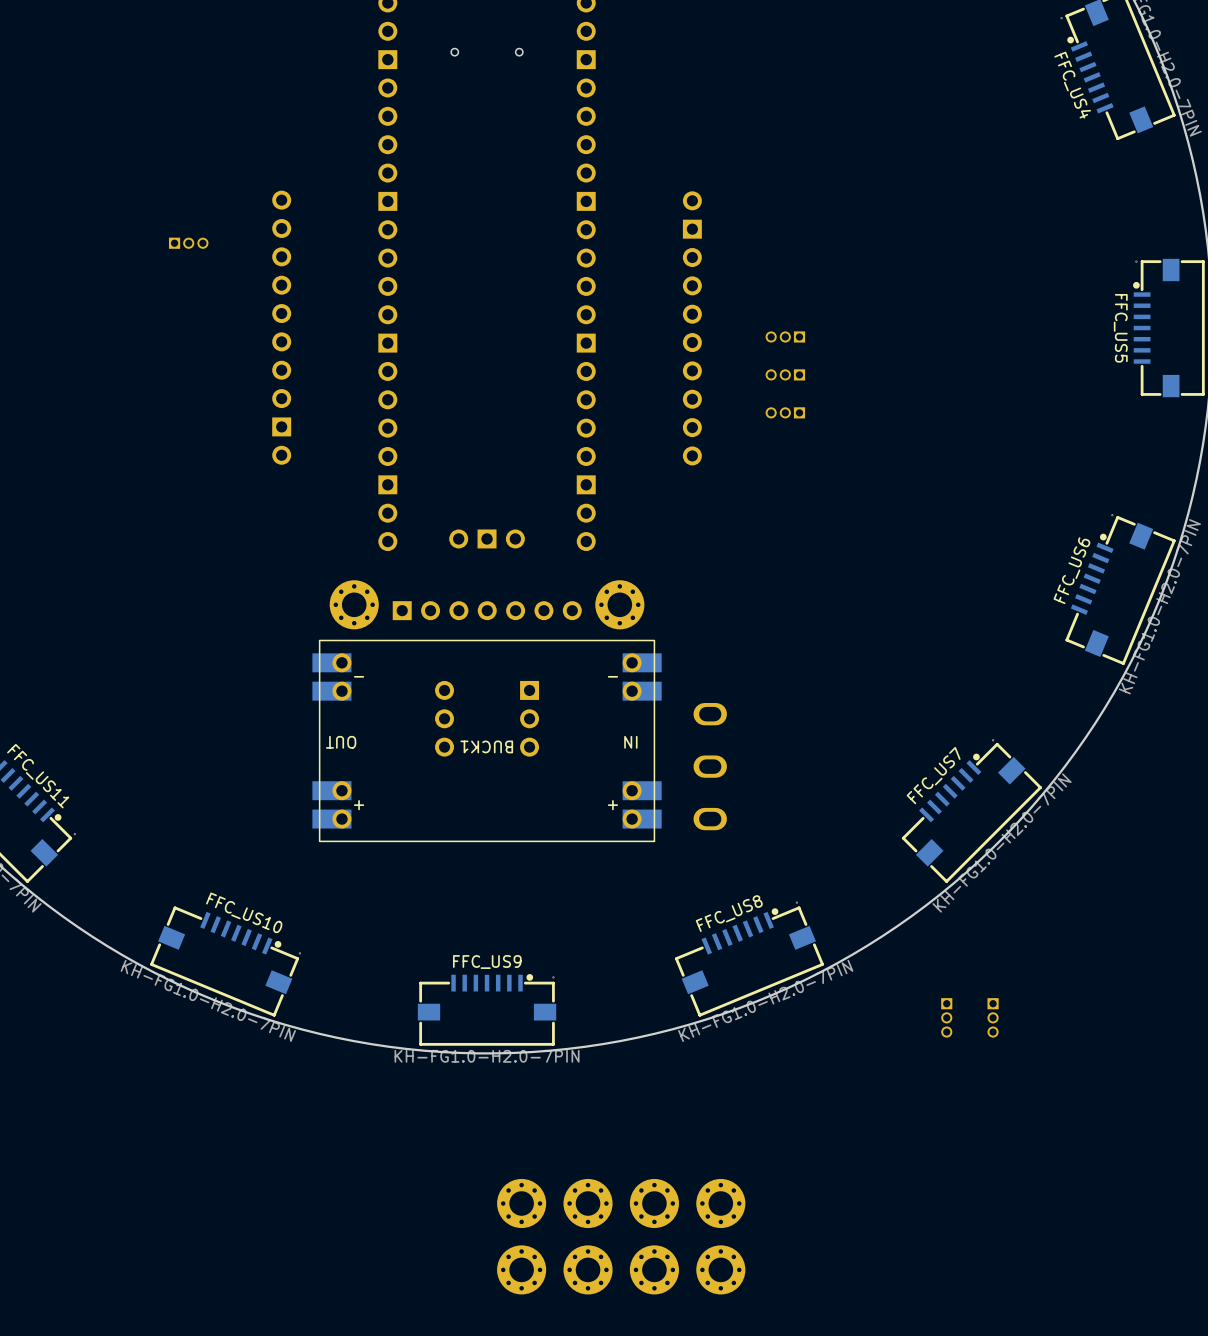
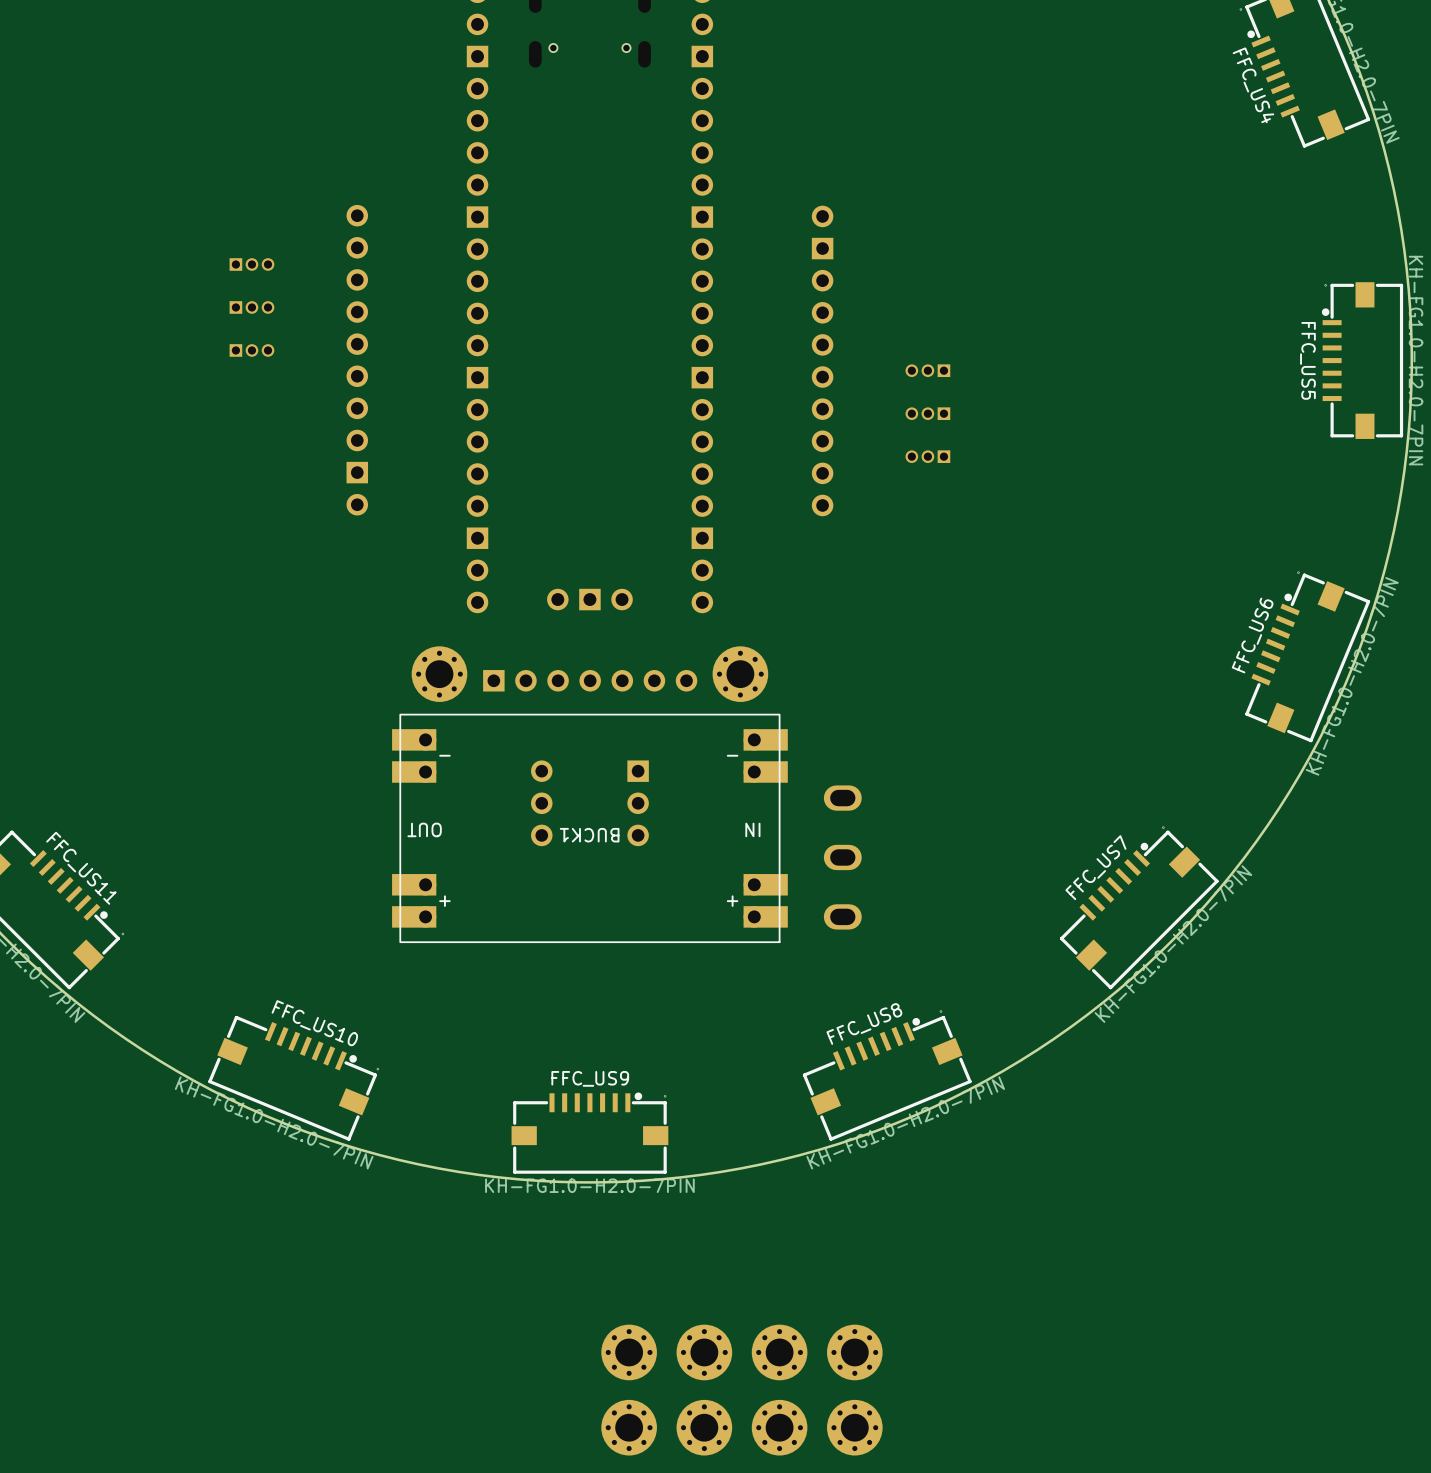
part: none -> (251, 307)
part: none -> (251, 350)
part: (946, 1017) -> none
part: (993, 1017) -> none

